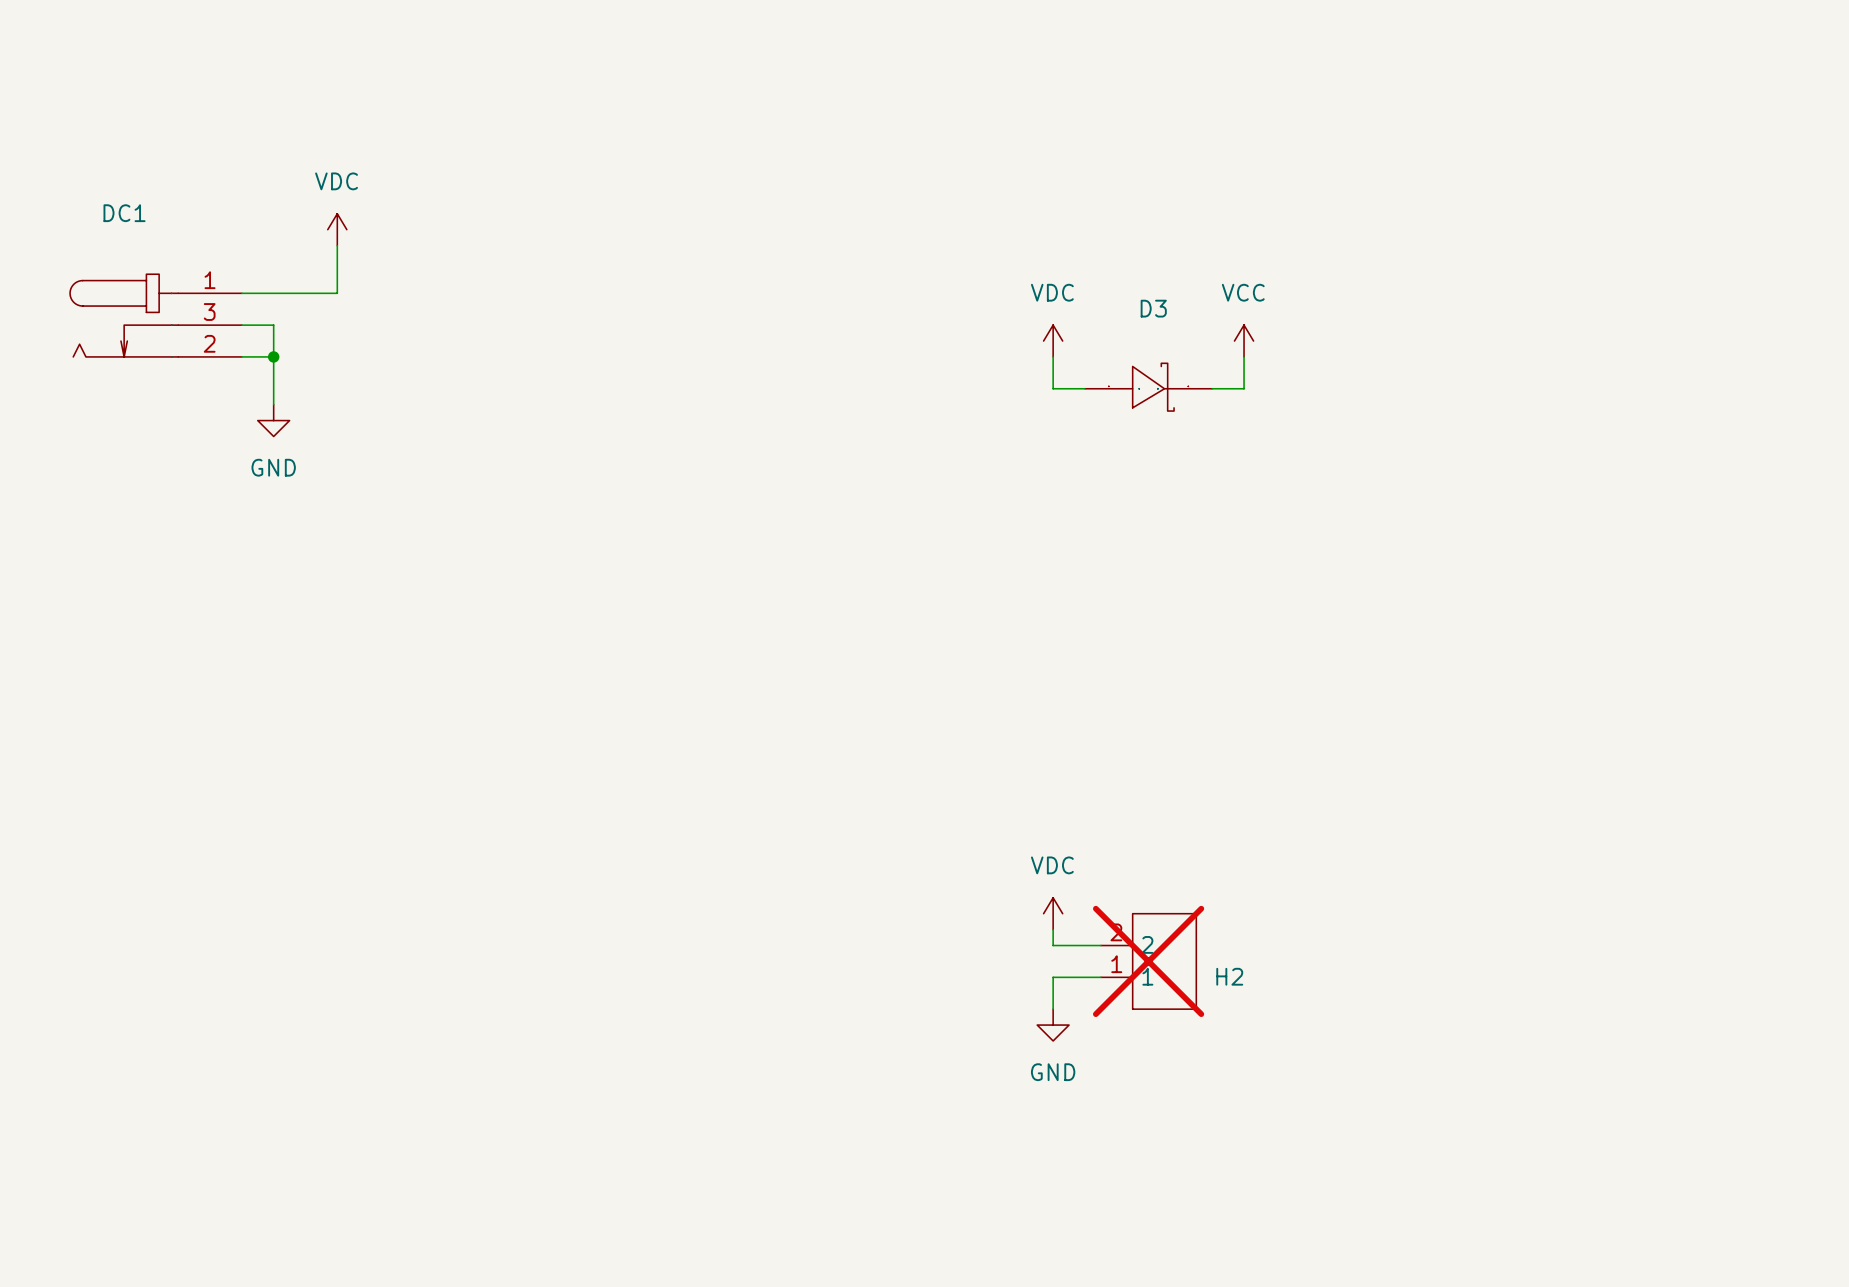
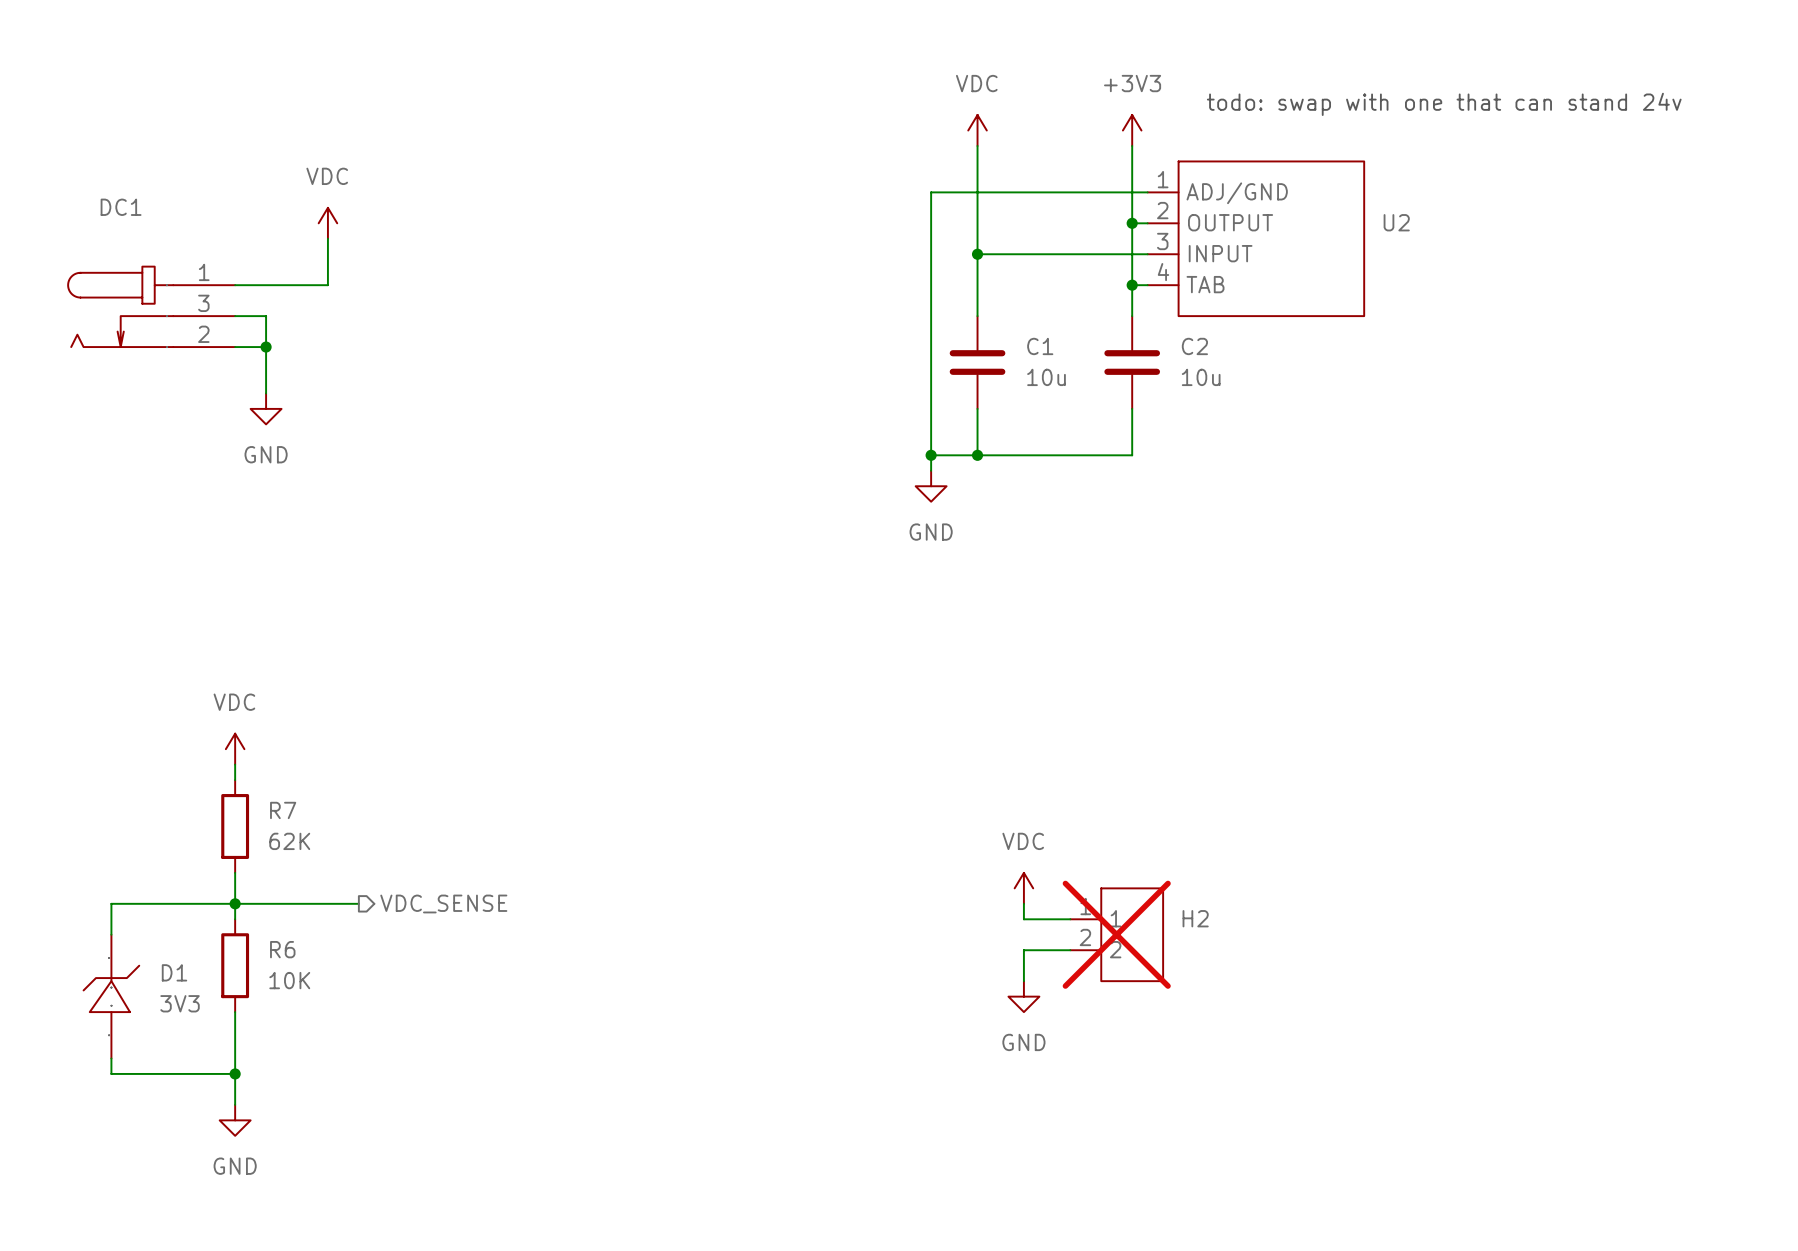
text: none -> todo: swap with one that can stand 24v (1444, 104)
power symbol: none -> +3V3 (1132, 130)
wire: none -> (977, 145) (977, 316)
wire: none -> (1132, 145) (1132, 316)
wire: none -> (1147, 192) (931, 192) (931, 470)
wire: none -> (1132, 223) (1147, 223)
junction: none -> (1132, 223)
U2: none -> (1255, 238)
wire: none -> (977, 254) (1147, 254)
junction: none -> (977, 254)
wire: none -> (1132, 285) (1147, 285)
junction: none -> (1132, 285)
power symbol position: VDC (1053, 341) -> VDC (977, 130)
power symbol: VCC (1244, 341) -> none
wire: (1053, 356) (1053, 388) (1084, 388) -> none
wire: (1244, 356) (1244, 388) (1212, 388) -> none
C1: none -> 10u (977, 362)
C2: none -> 10u (1132, 362)
D3: (1148, 387) -> none
wire: none -> (977, 408) (977, 455)
wire: none -> (1132, 408) (1132, 455) (931, 455)
junction: none -> (931, 455)
junction: none -> (977, 455)
power symbol: none -> GND (931, 486)
power symbol: none -> VDC (235, 749)
wire: none -> (235, 764) (235, 780)
R7: none -> 62K (235, 826)
wire: none -> (235, 872) (235, 919)
junction: none -> (235, 903)
wire: none -> (358, 903) (111, 903) (111, 934)
hierarchical label: none -> VDC_SENSE (443, 903)
H2 flip: as is (1164, 961) -> up-down (1132, 934)
R6: none -> 10K (235, 965)
D1: none -> 3V3 (111, 996)
wire: none -> (235, 1012) (235, 1104)
wire: none -> (111, 1058) (111, 1073) (235, 1073)
junction: none -> (235, 1073)
power symbol: none -> GND (235, 1120)

